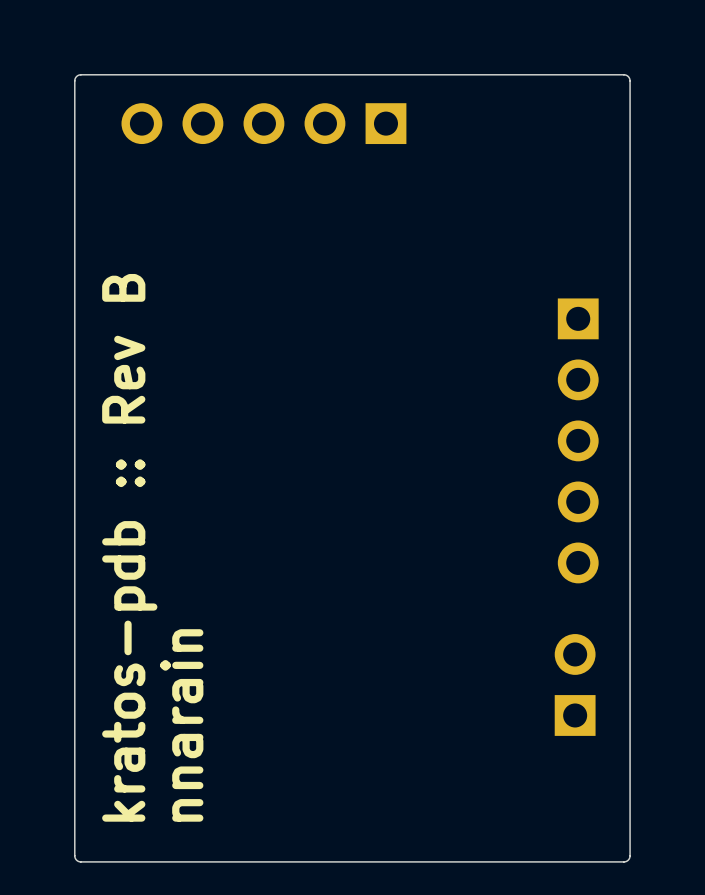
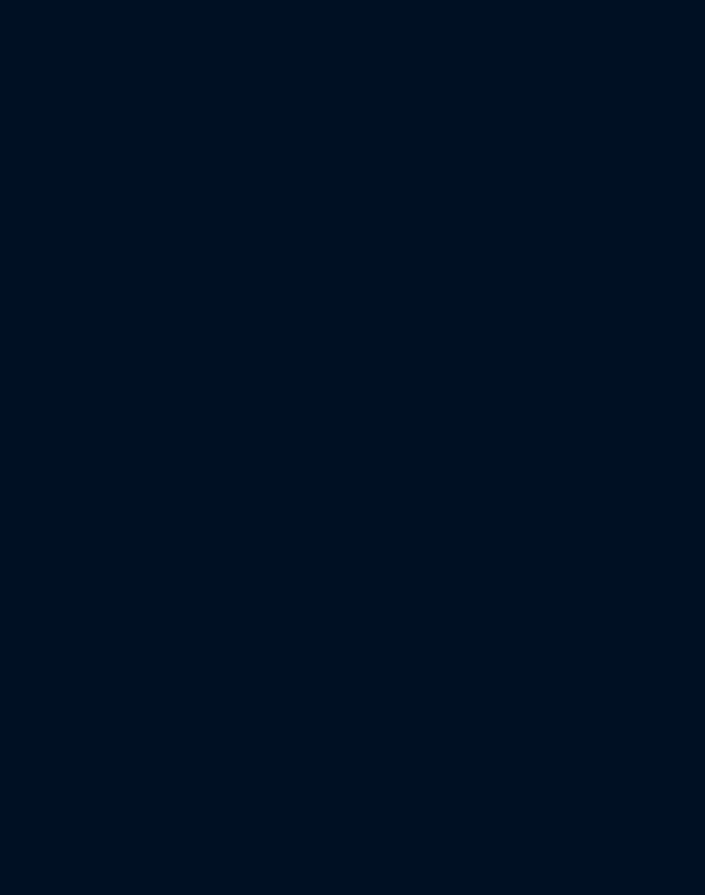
board edge: (623, 74) (80, 74) (76, 77) (74, 855) (77, 860) (623, 861) (628, 859) (630, 80) (628, 76) (623, 74) -> none
part: (263, 123) -> none
part: (578, 440) -> none
text: kratos-pdb :: Rev B (129, 547) -> none
part: (575, 684) -> none
text: nnarain (181, 725) -> none

